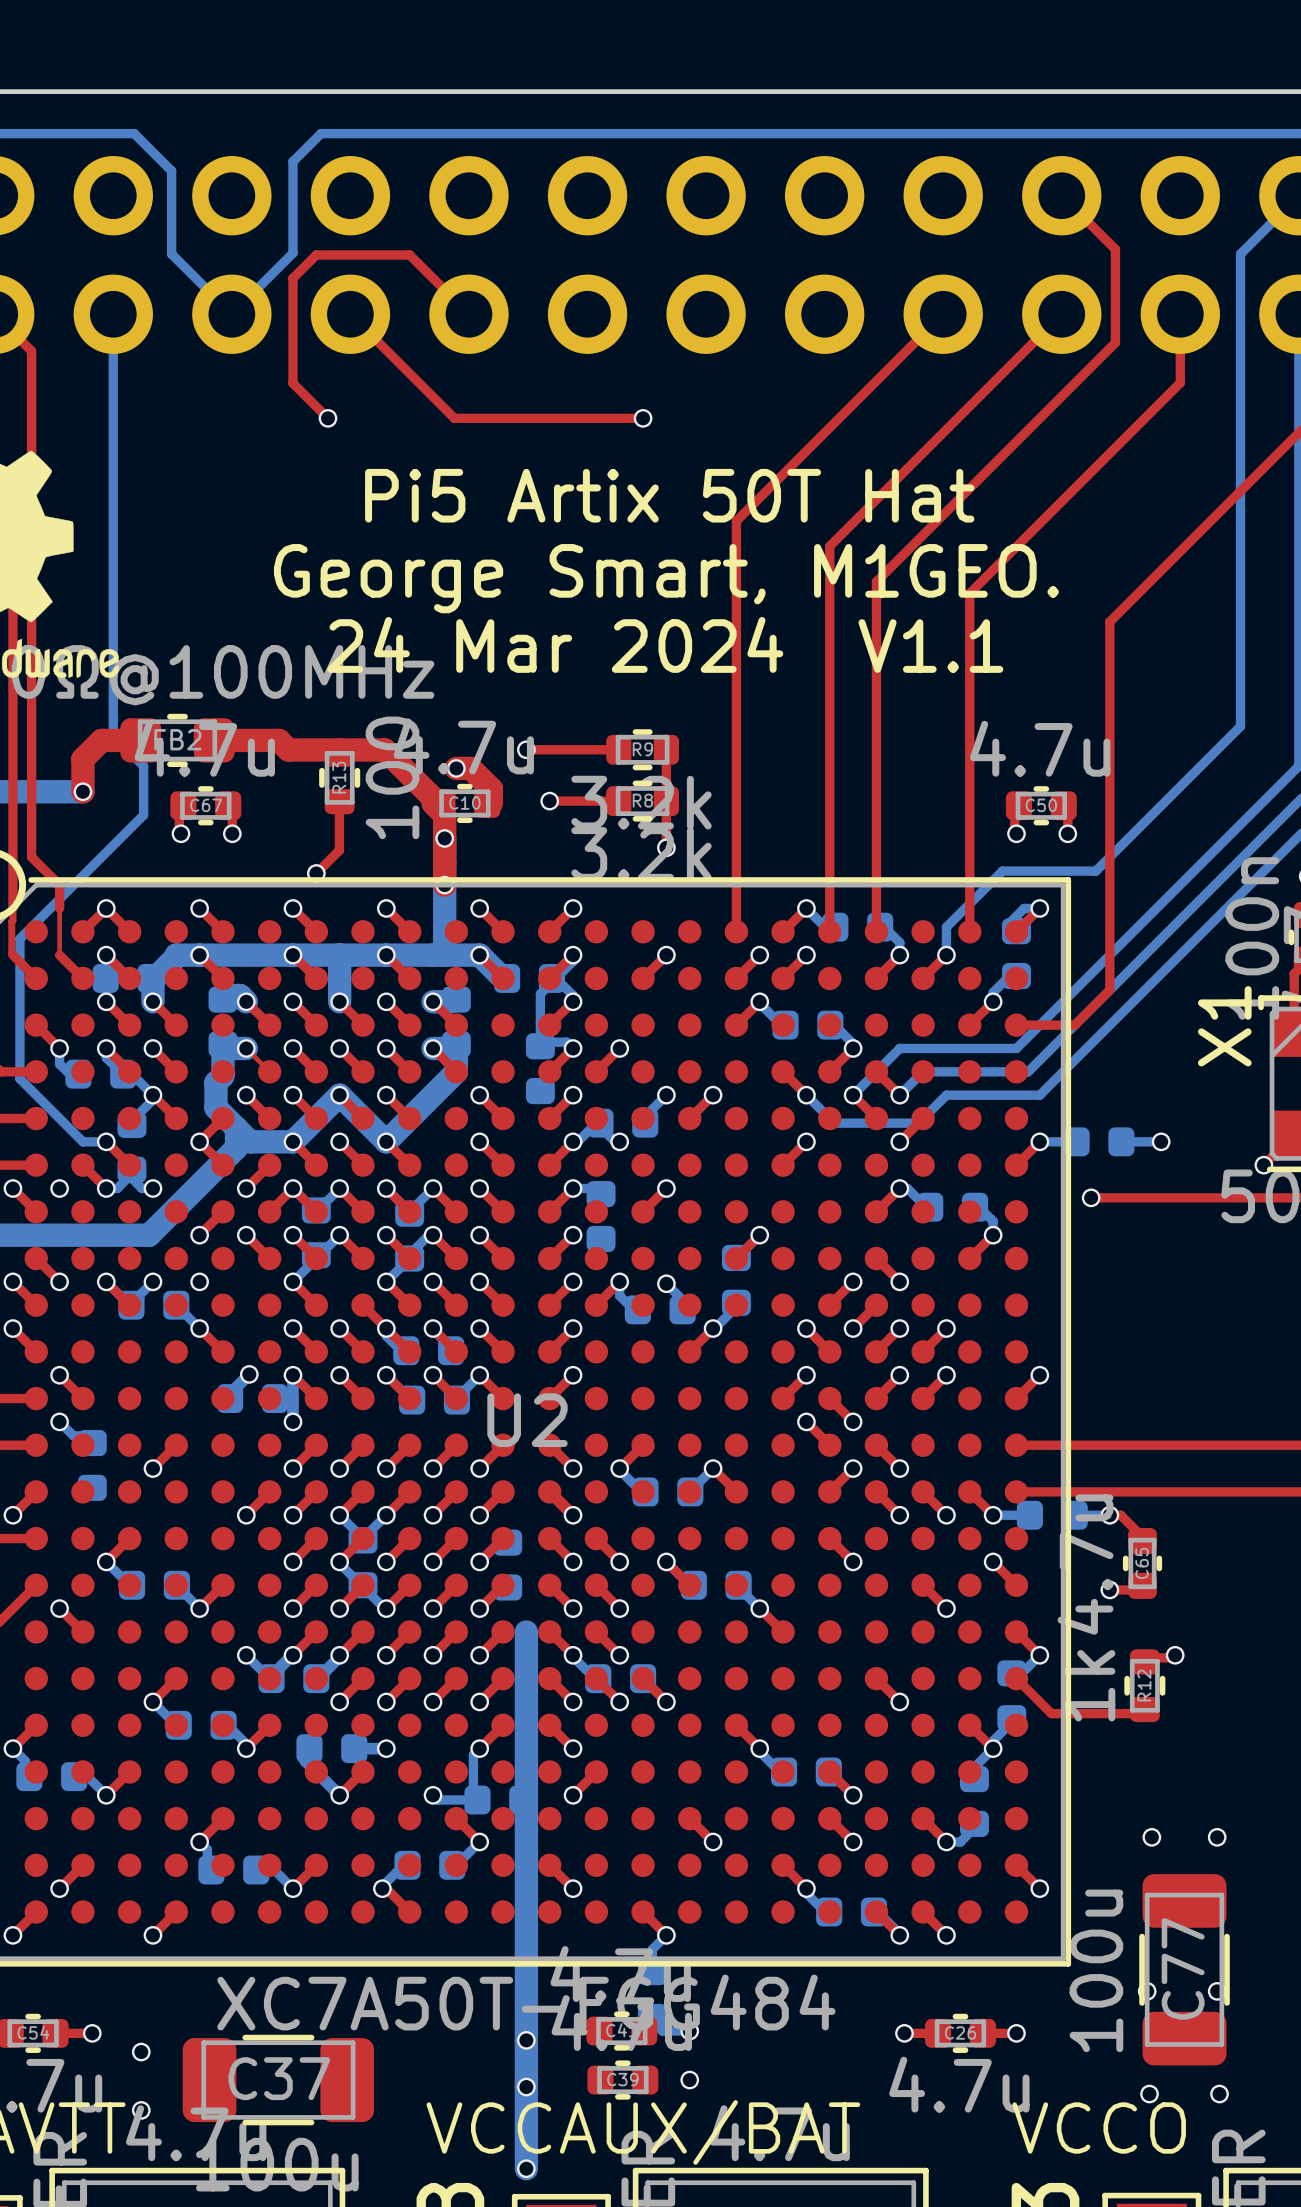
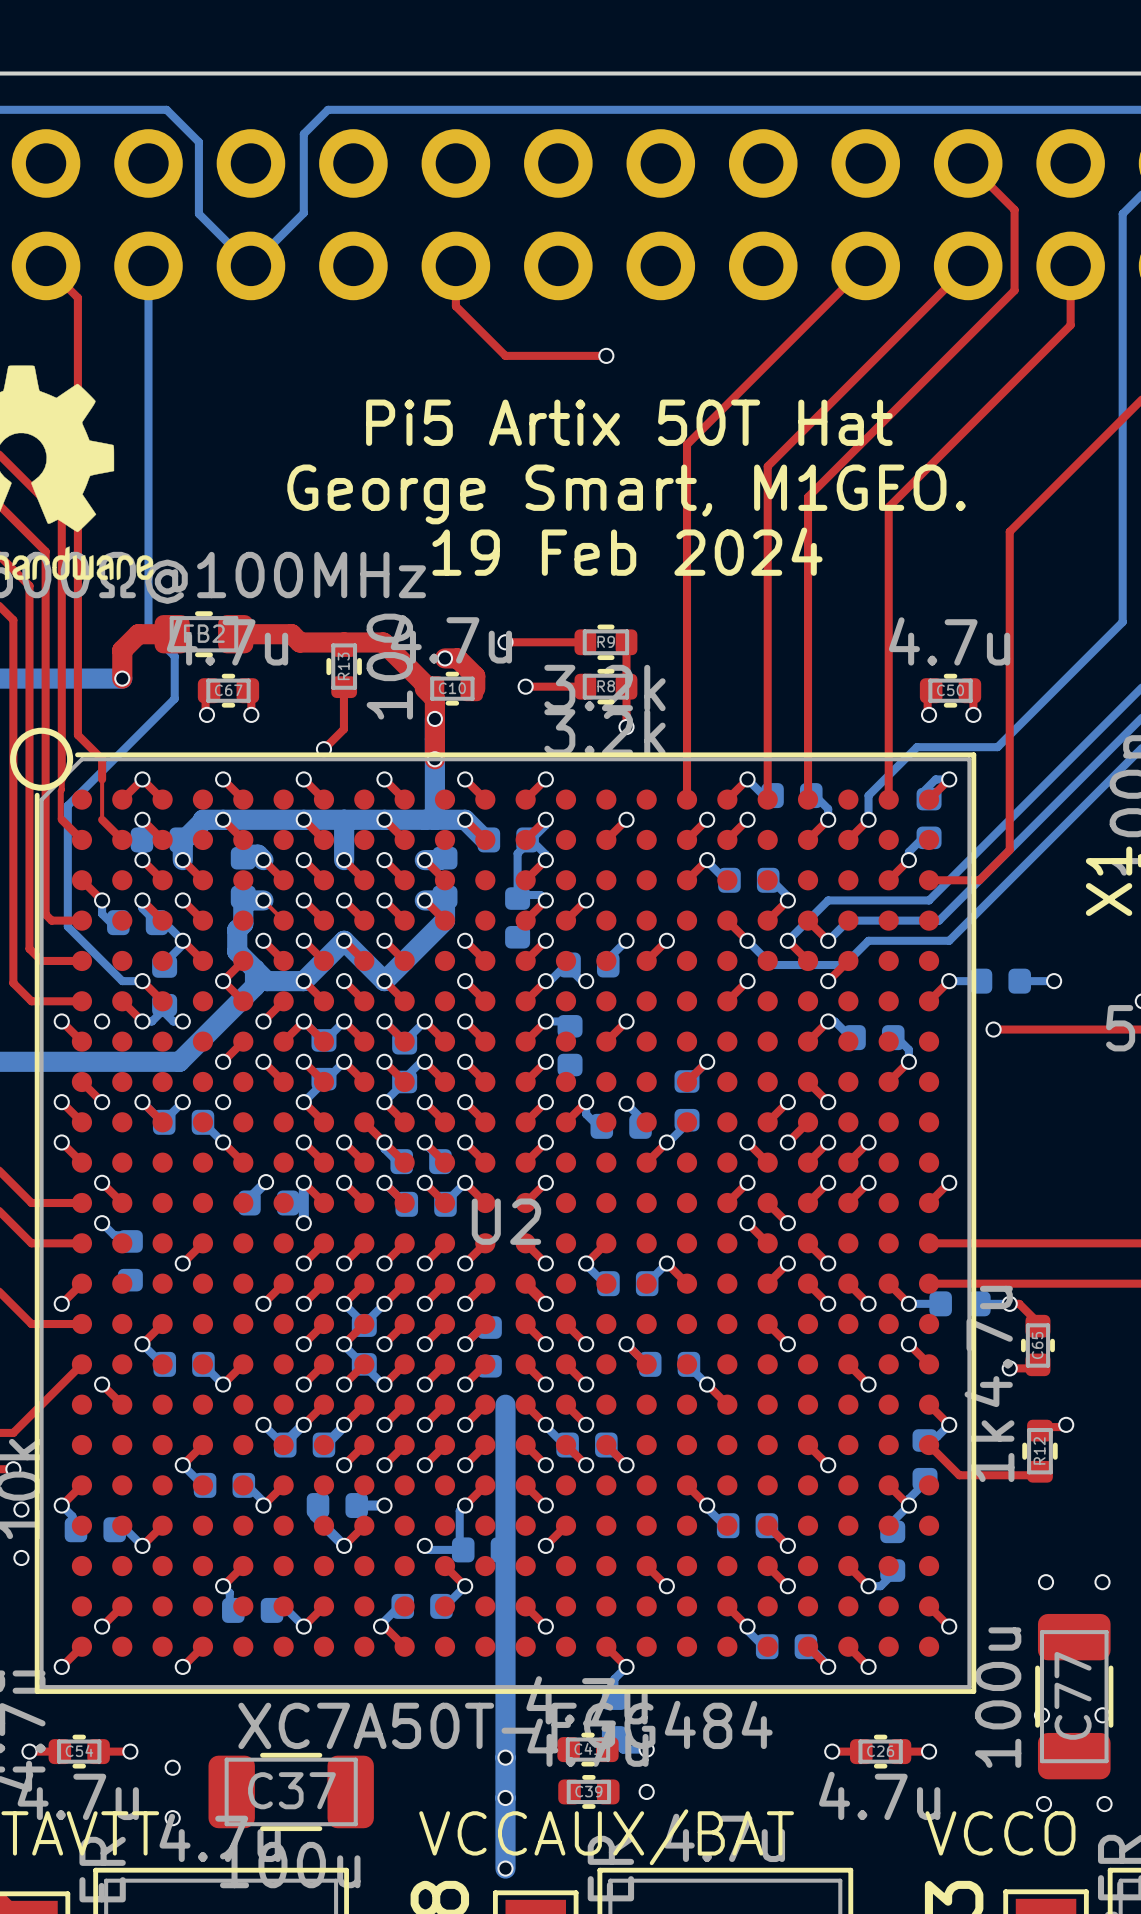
top track: (350, 314) (454, 418) (526, 418) -> (455, 265) (455, 306) (505, 355)
top track: (468, 314) (409, 254) (316, 254) (293, 278) (293, 383) (328, 418) -> none
via: (328, 418) -> none
text: 24 Mar 2024 V1.1 (665, 644) -> 19 Feb 2024 (627, 551)

